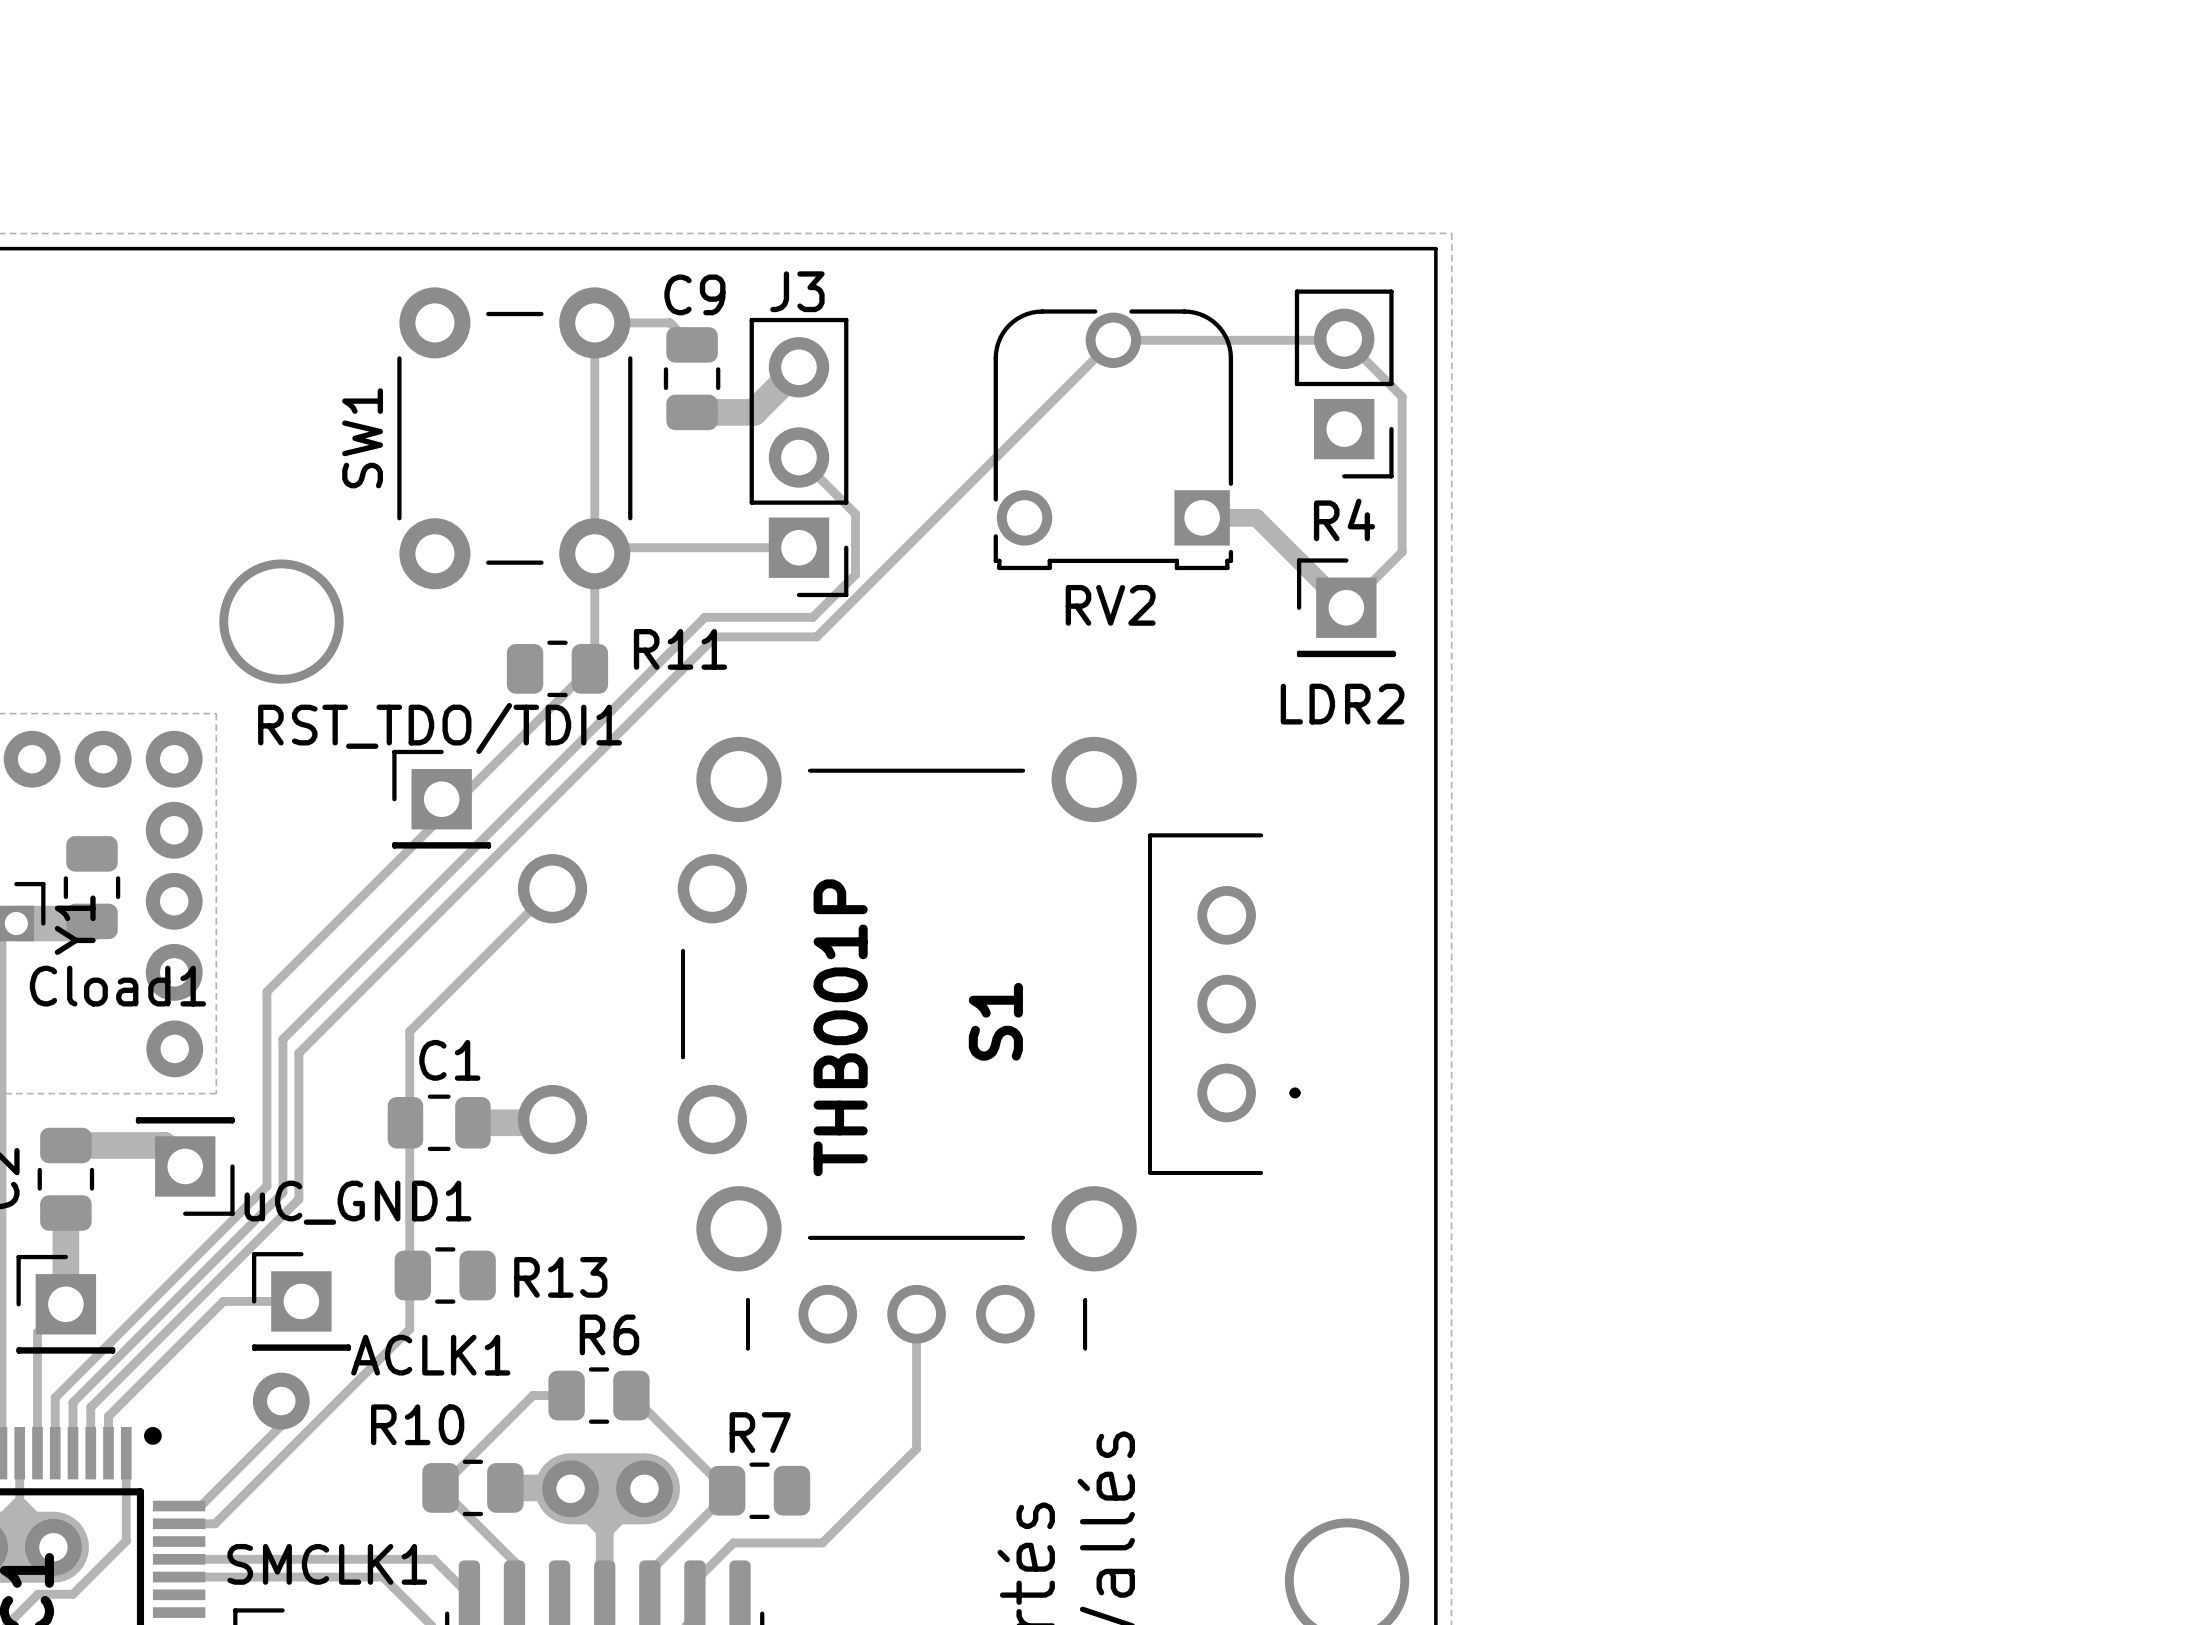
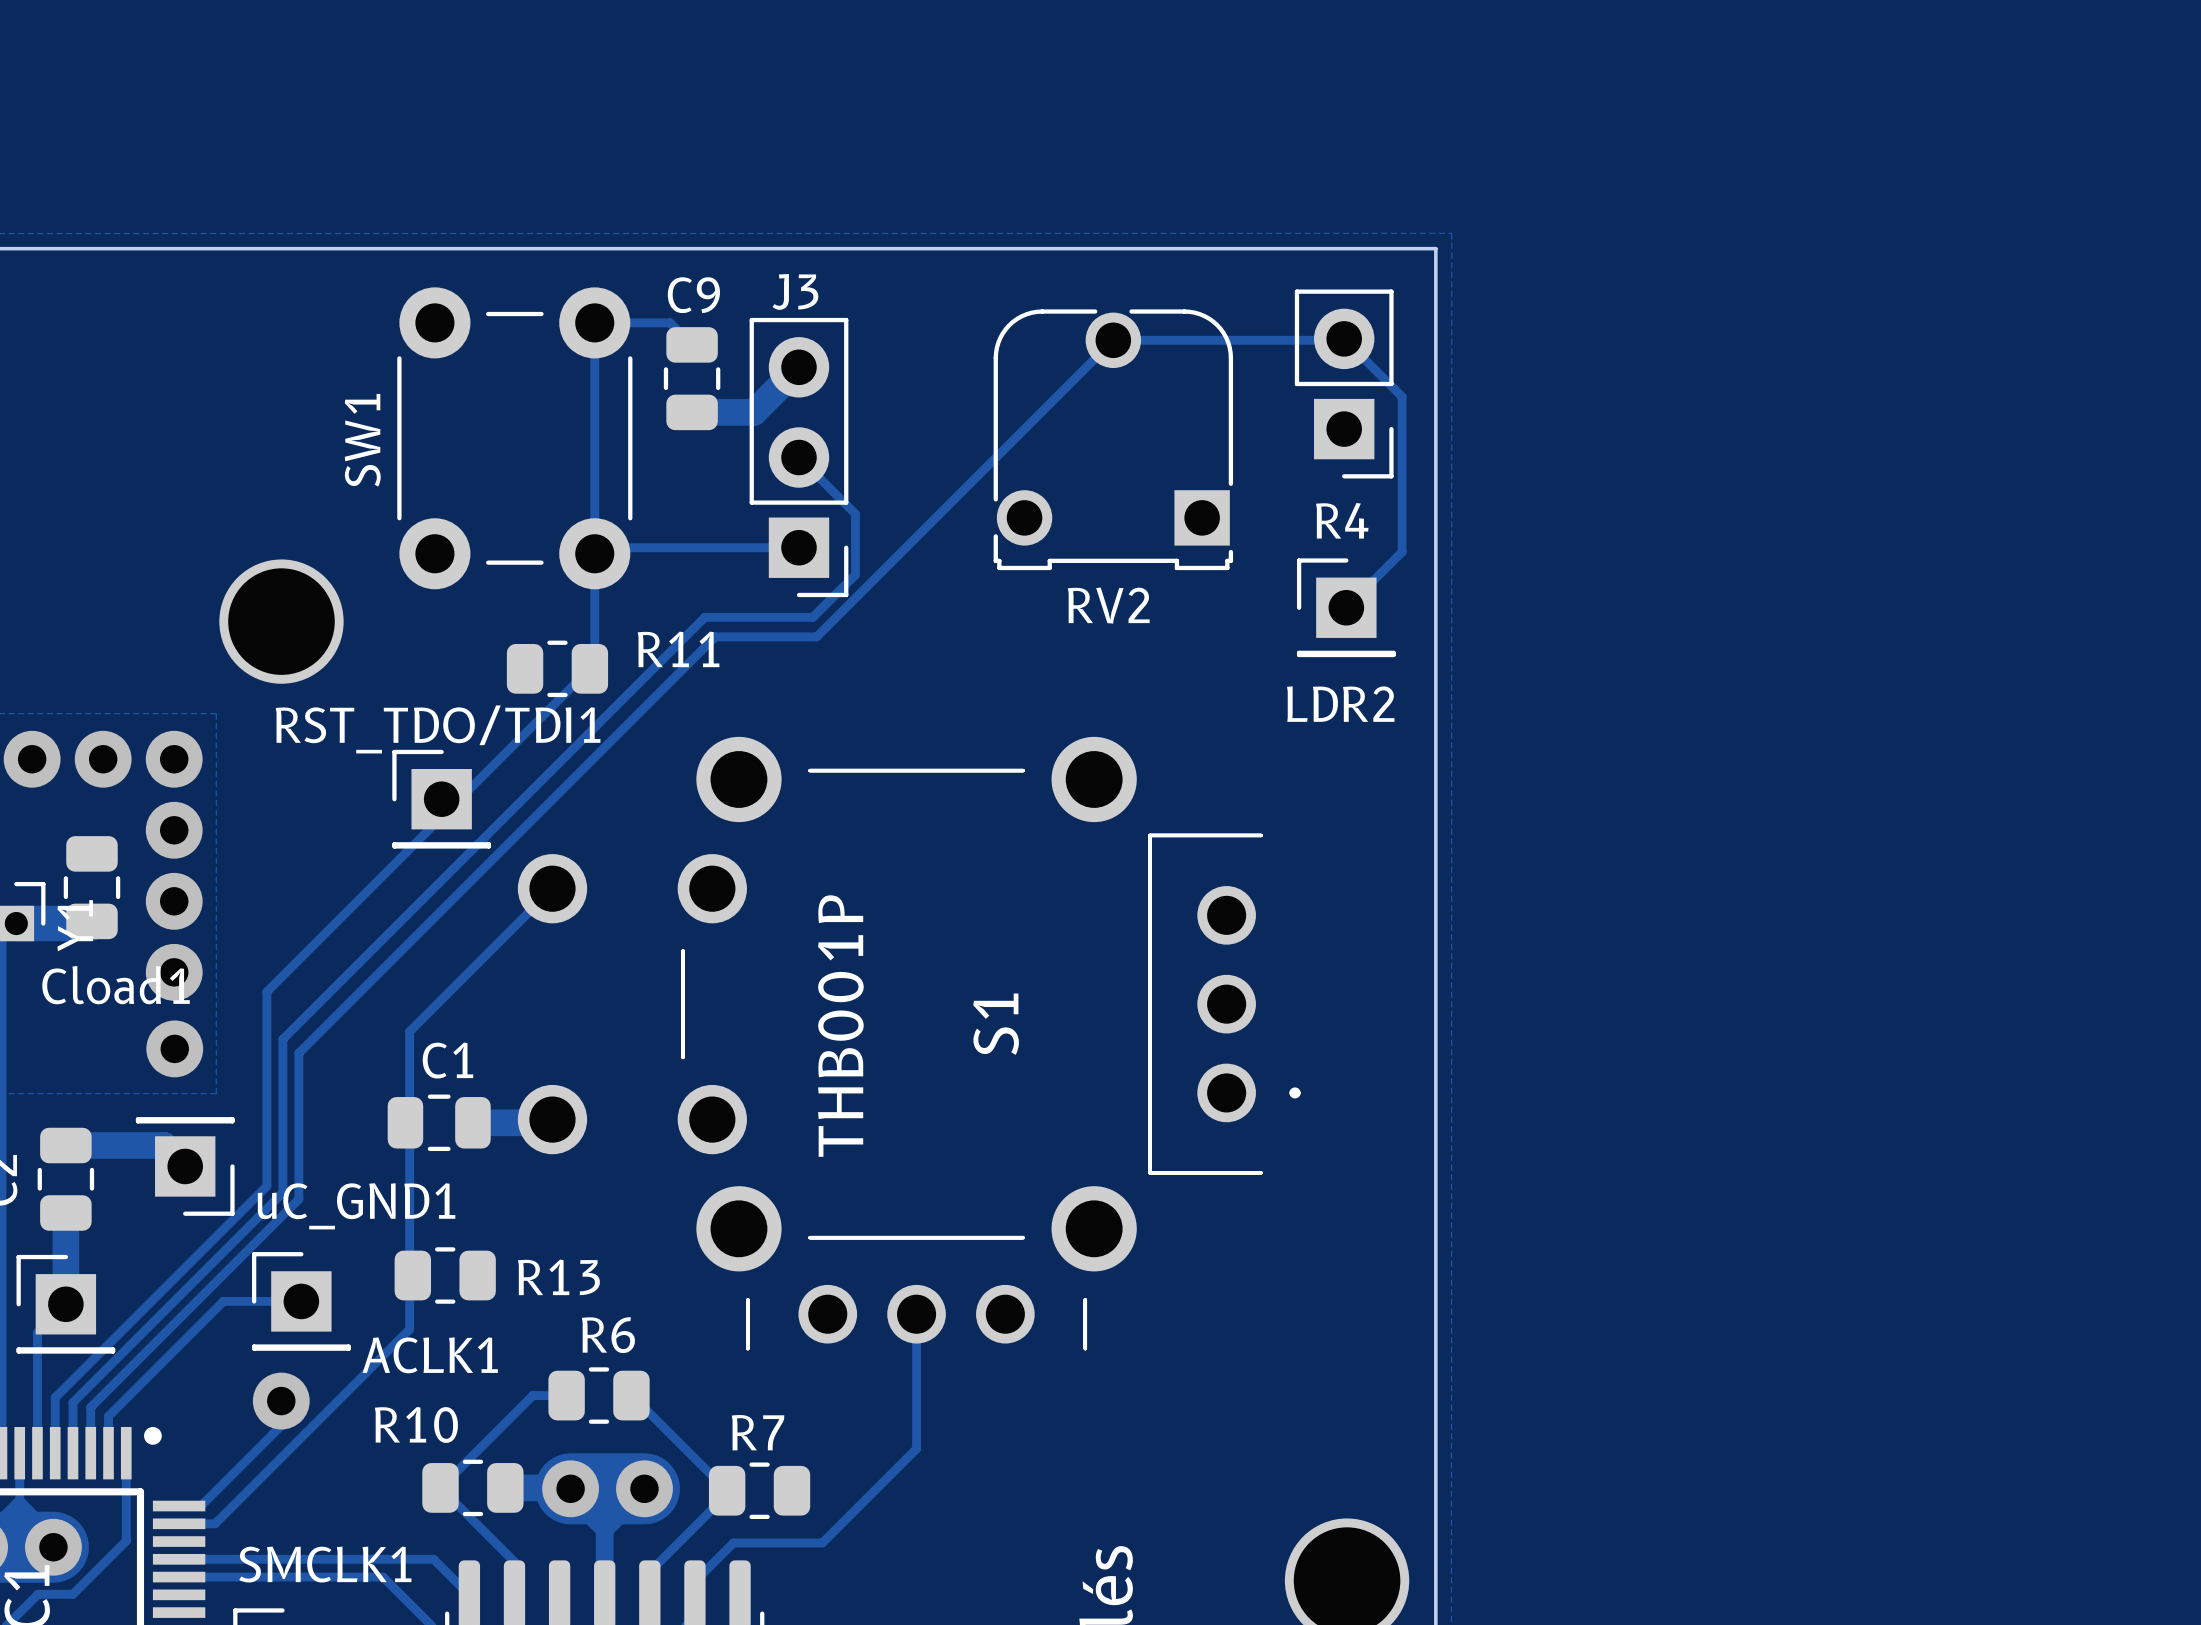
track: (1202, 517) (1256, 517) (1346, 607) -> none

